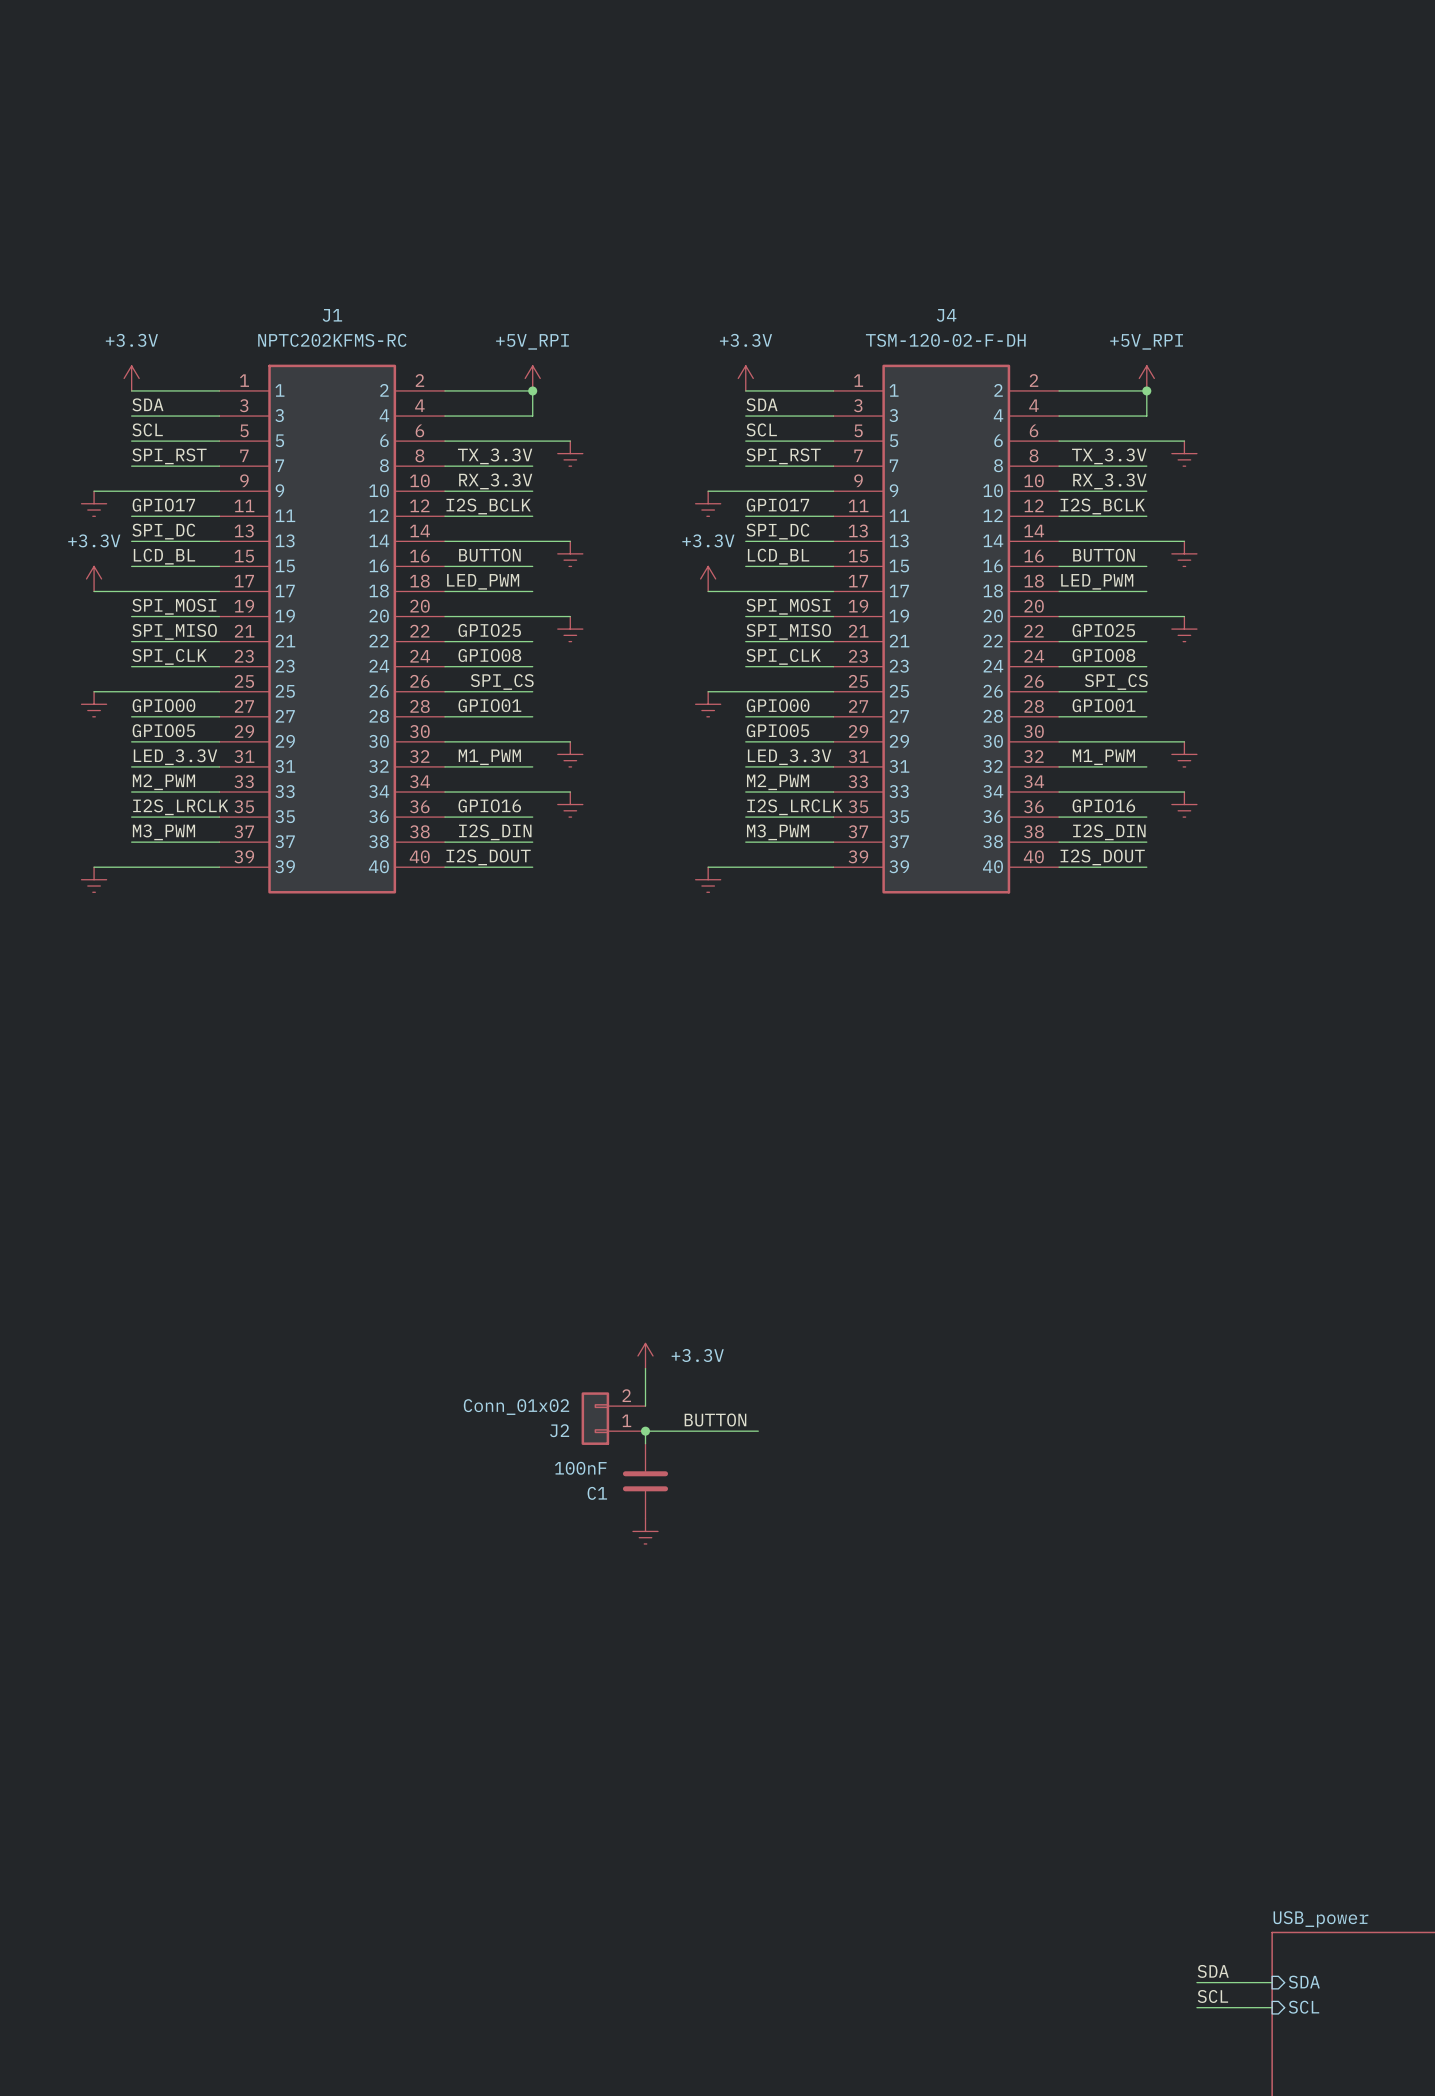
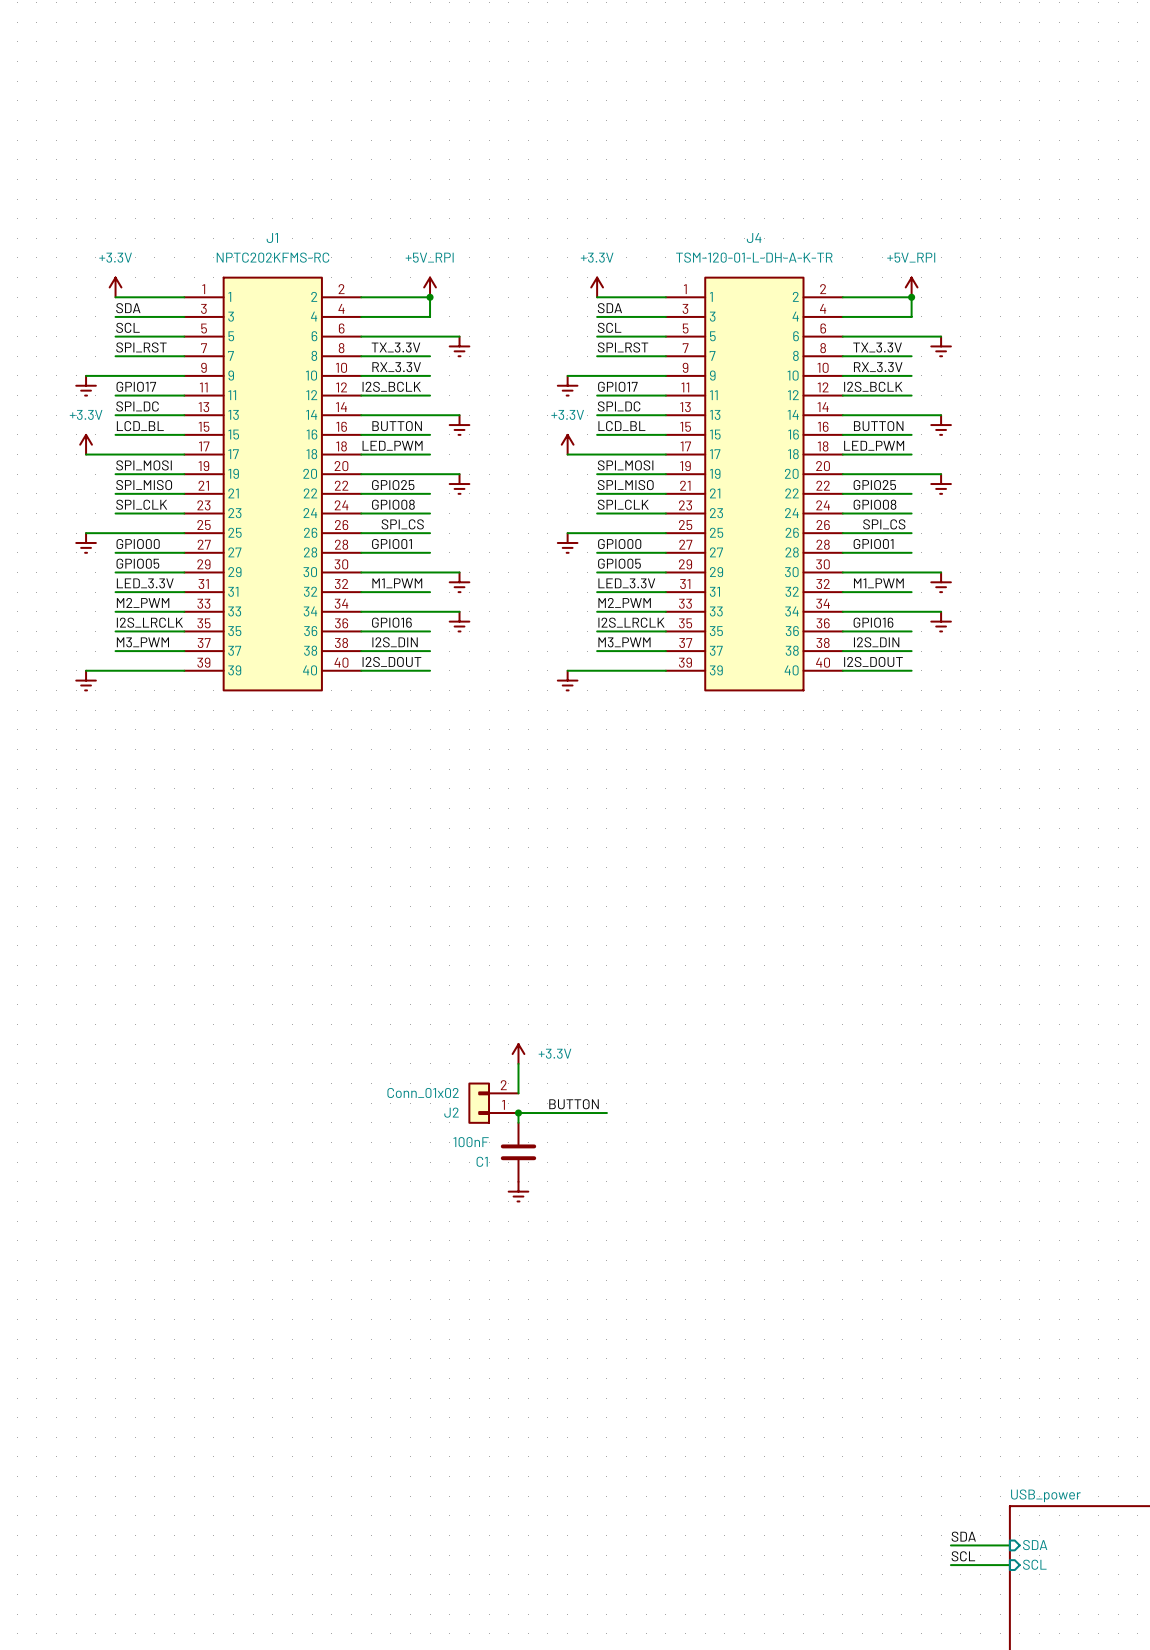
J4 value: TSM-120-02-F-DH (945, 340) -> TSM-120-01-L-DH-A-K-TR (754, 257)

